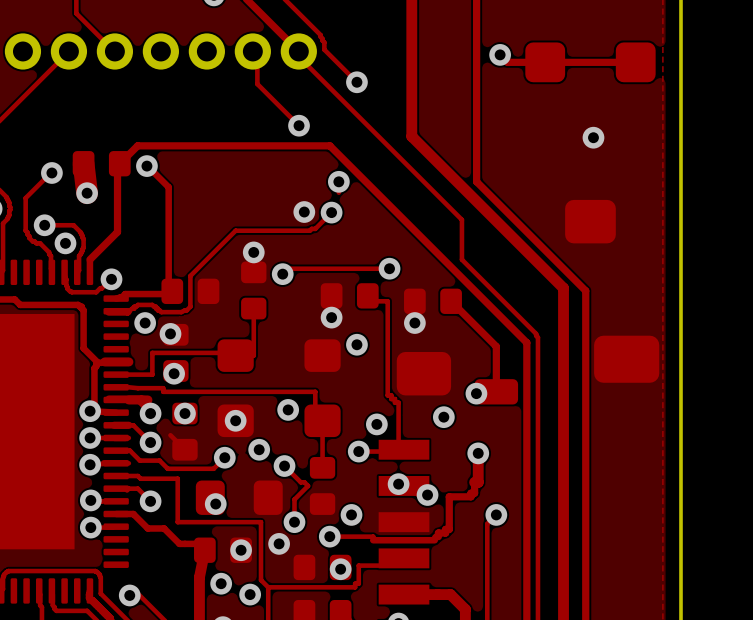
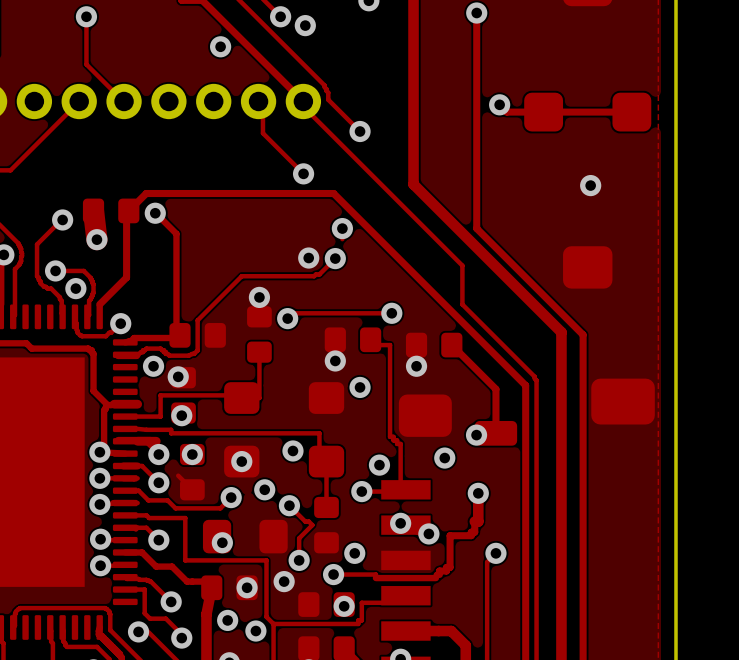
track: none -> (125, 577) (150, 581) (171, 601)
track: none -> (125, 589) (144, 589) (144, 613) (150, 618) (165, 618) (181, 634) (181, 638)
via: none -> (171, 601)
via: none -> (181, 638)

